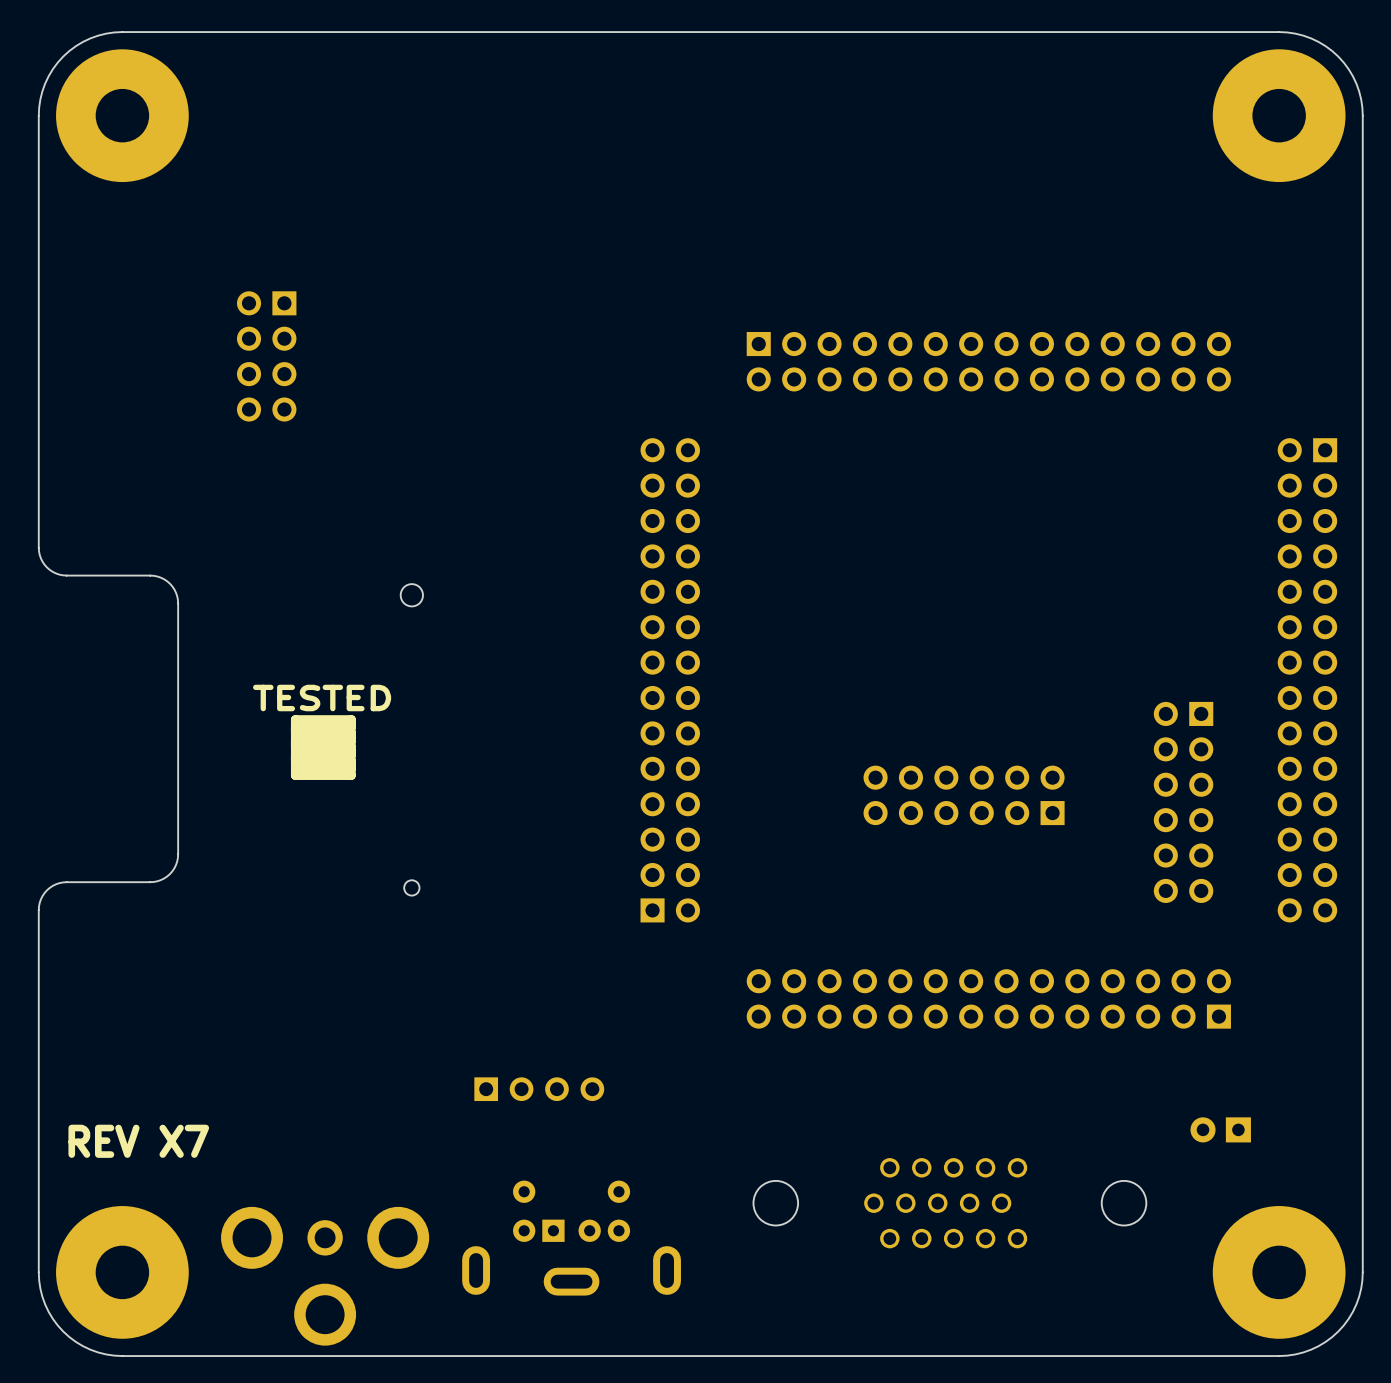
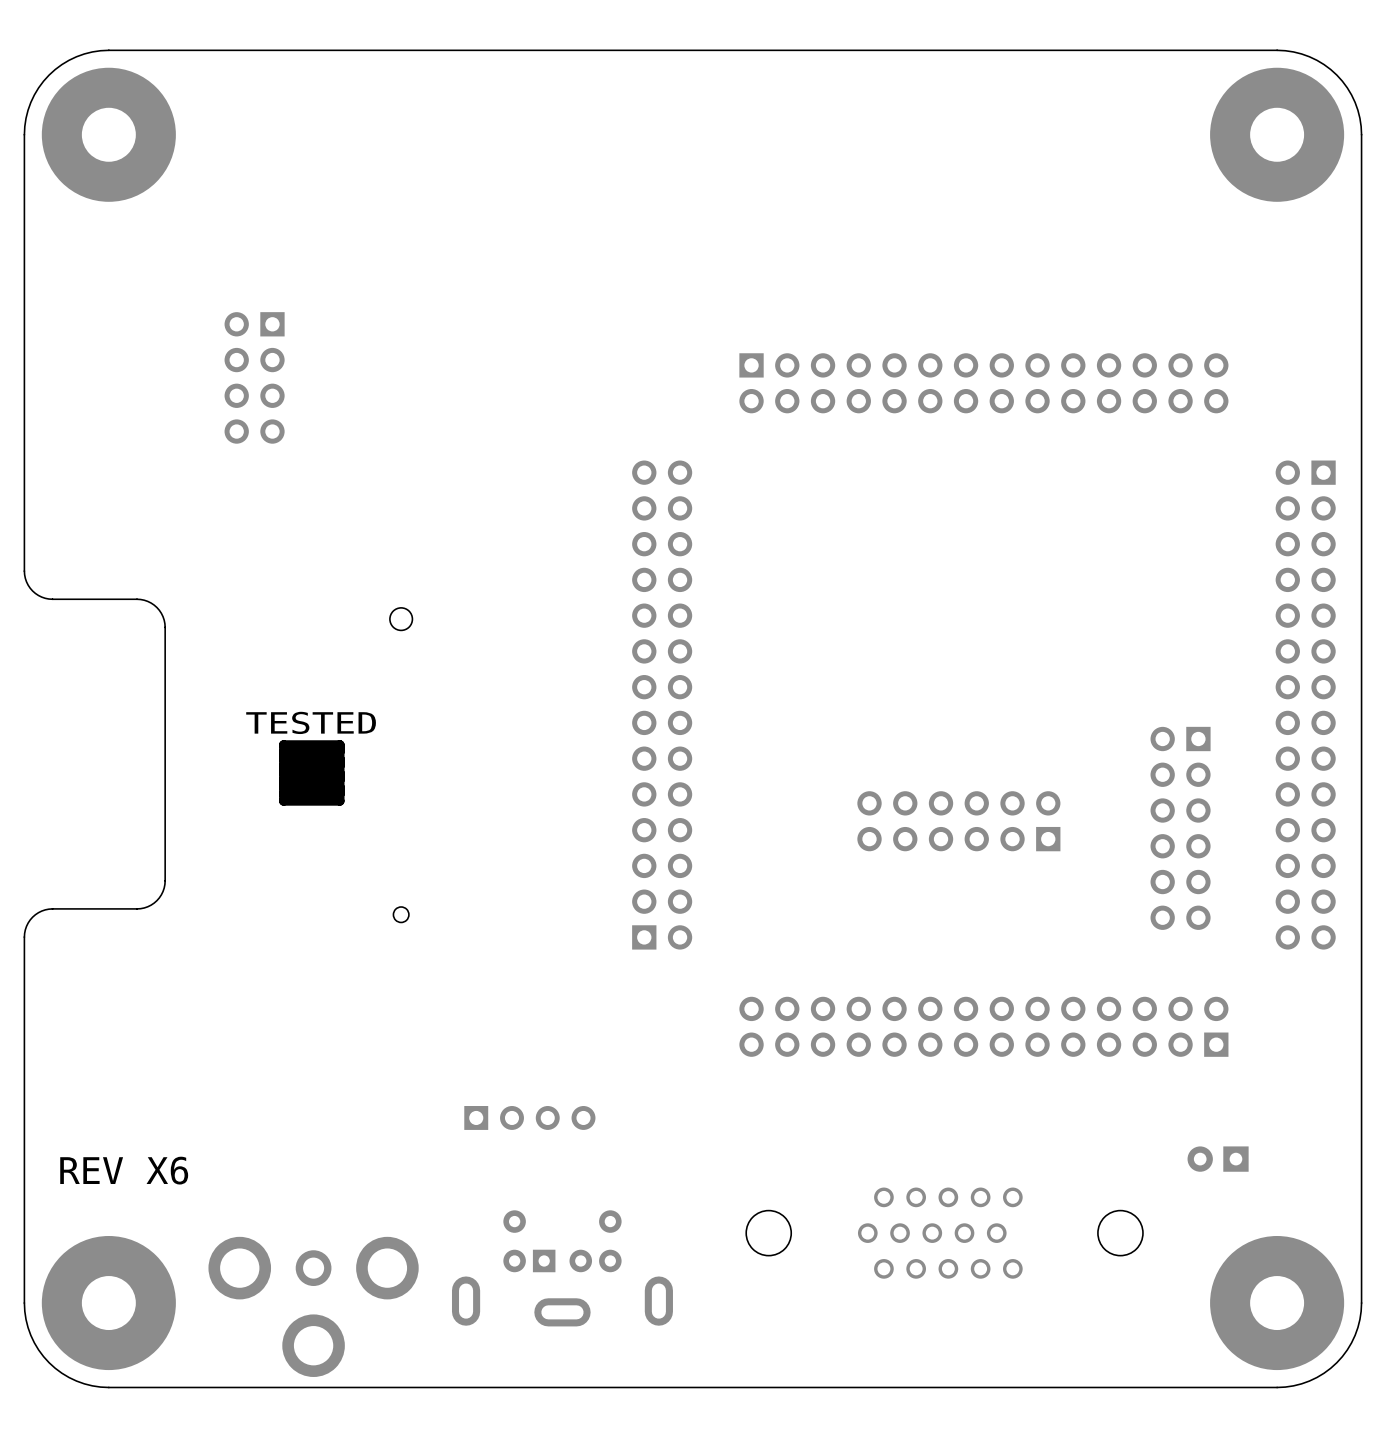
text: REV X7 (138, 1141) -> REV X6 (124, 1170)

